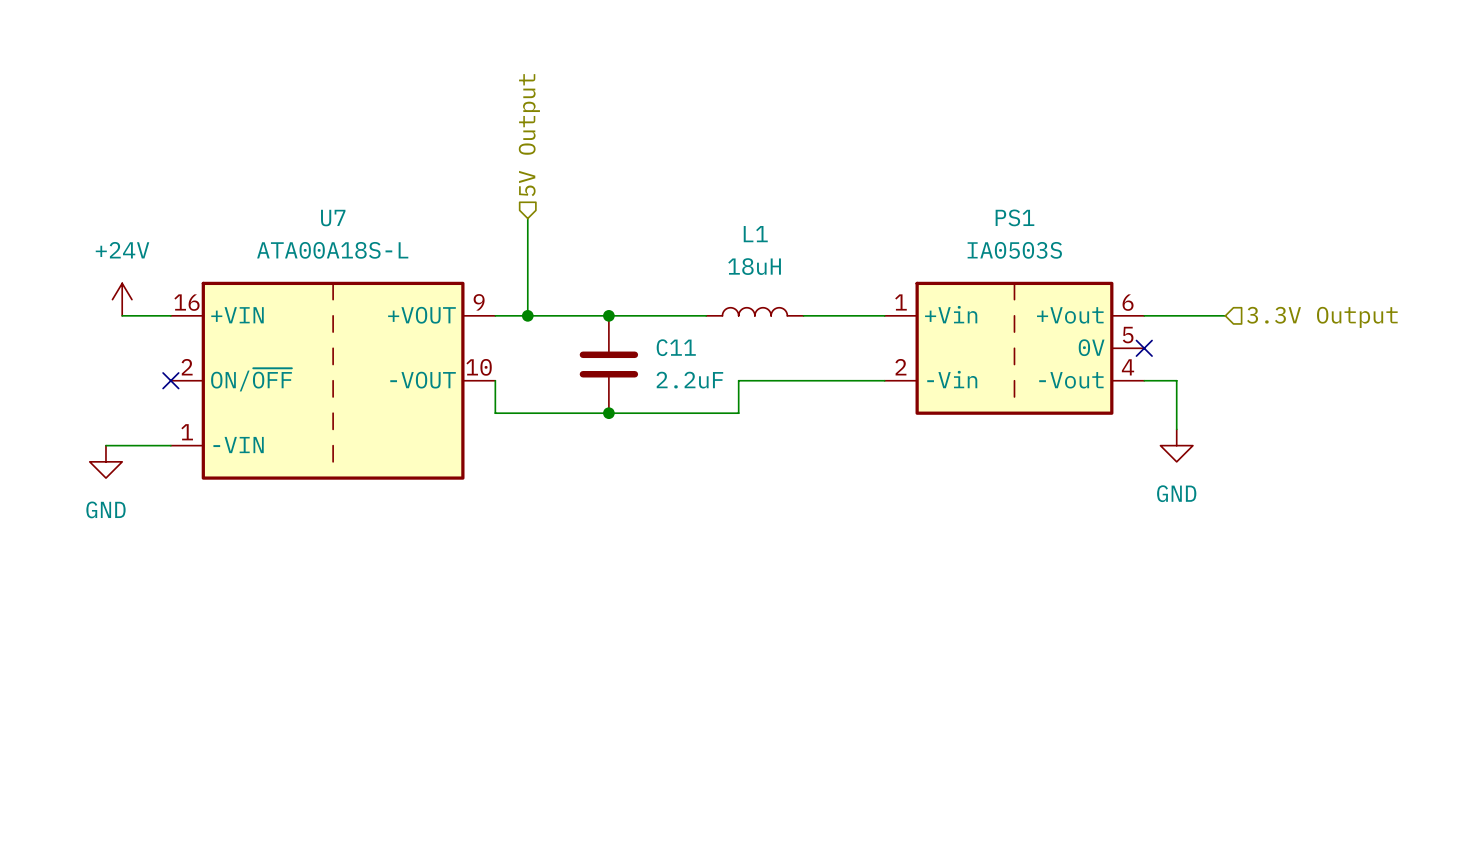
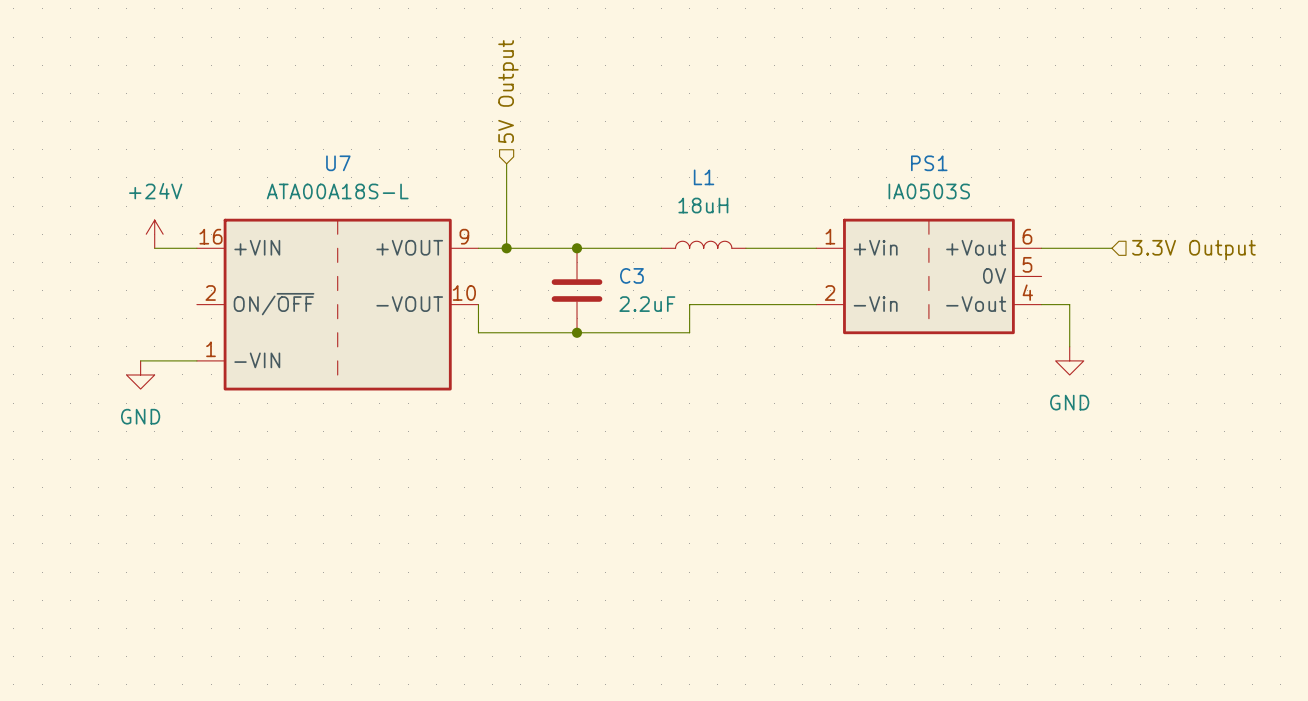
C11 name: C11 (676, 347) -> C3 (631, 275)
no-connect mark: (1144, 348) -> none
no-connect mark: (170, 380) -> none

